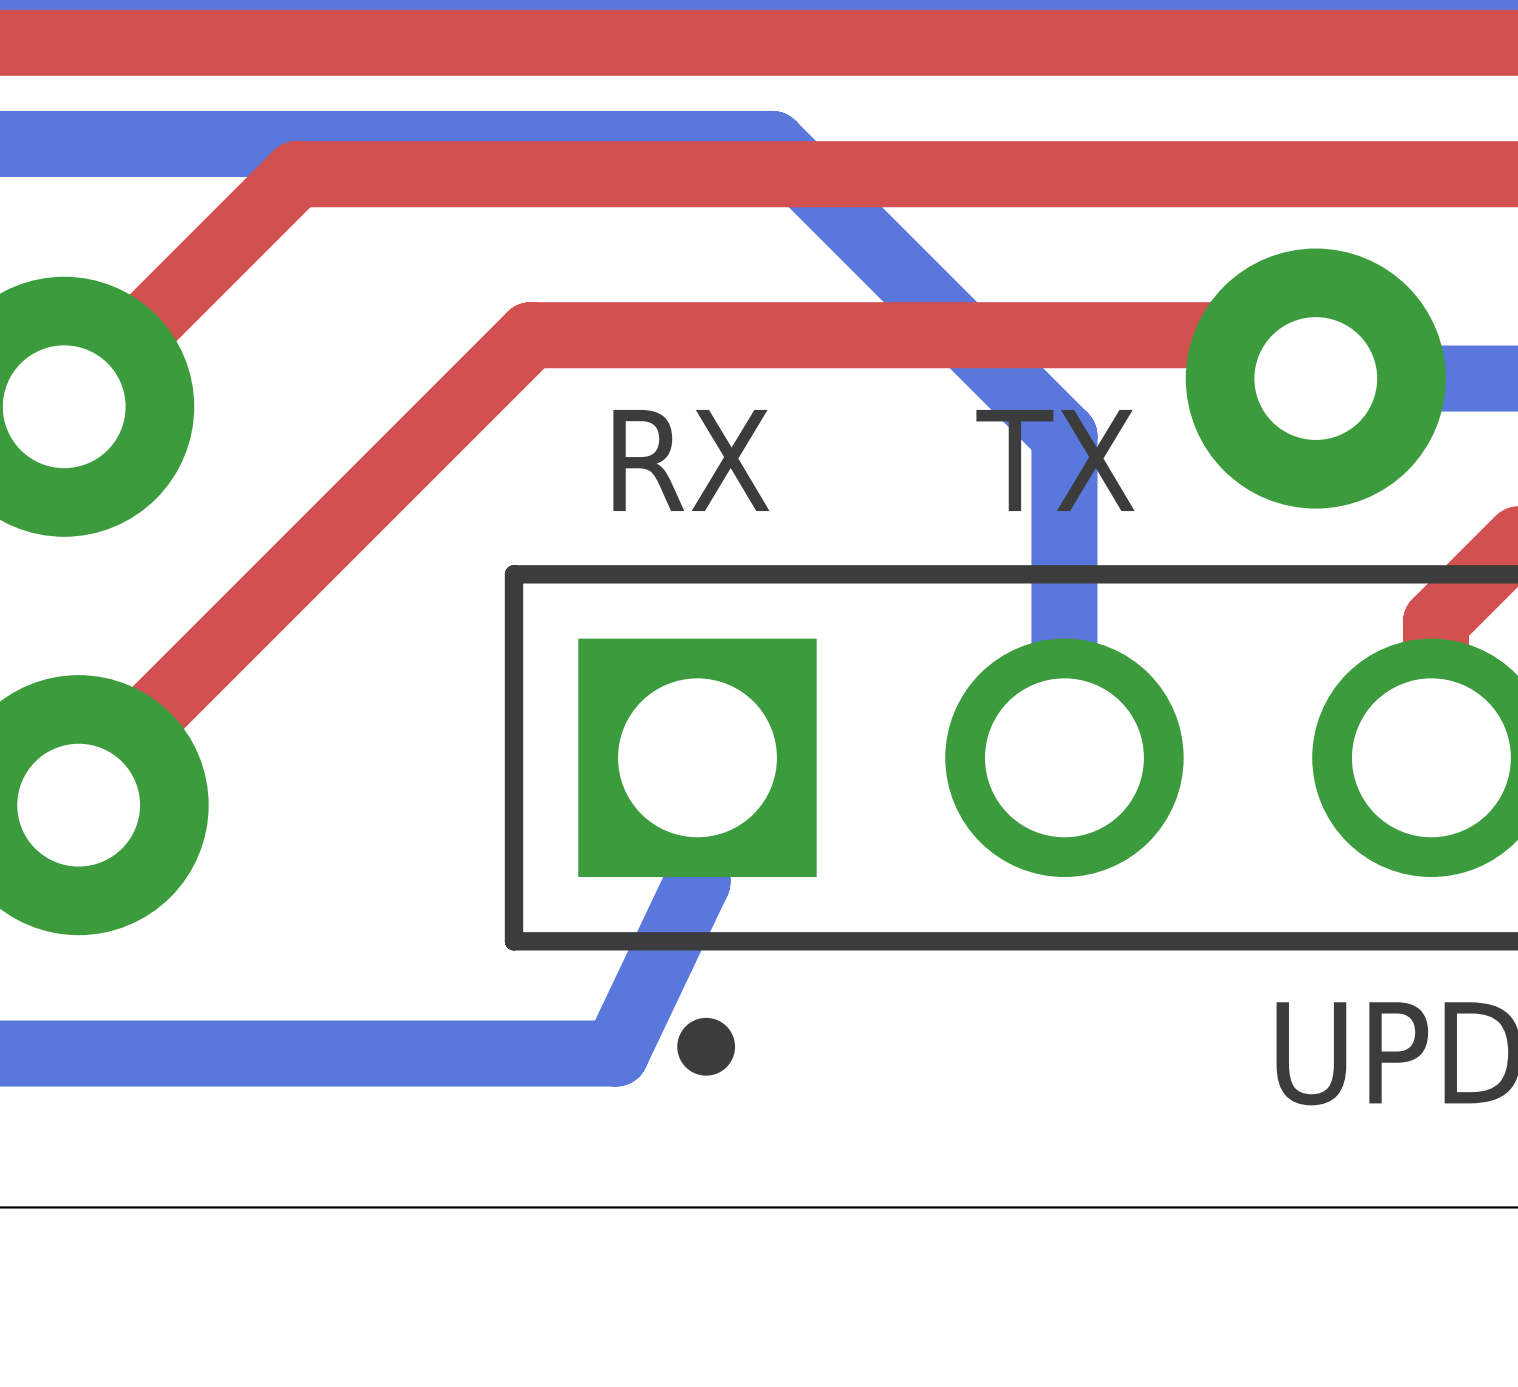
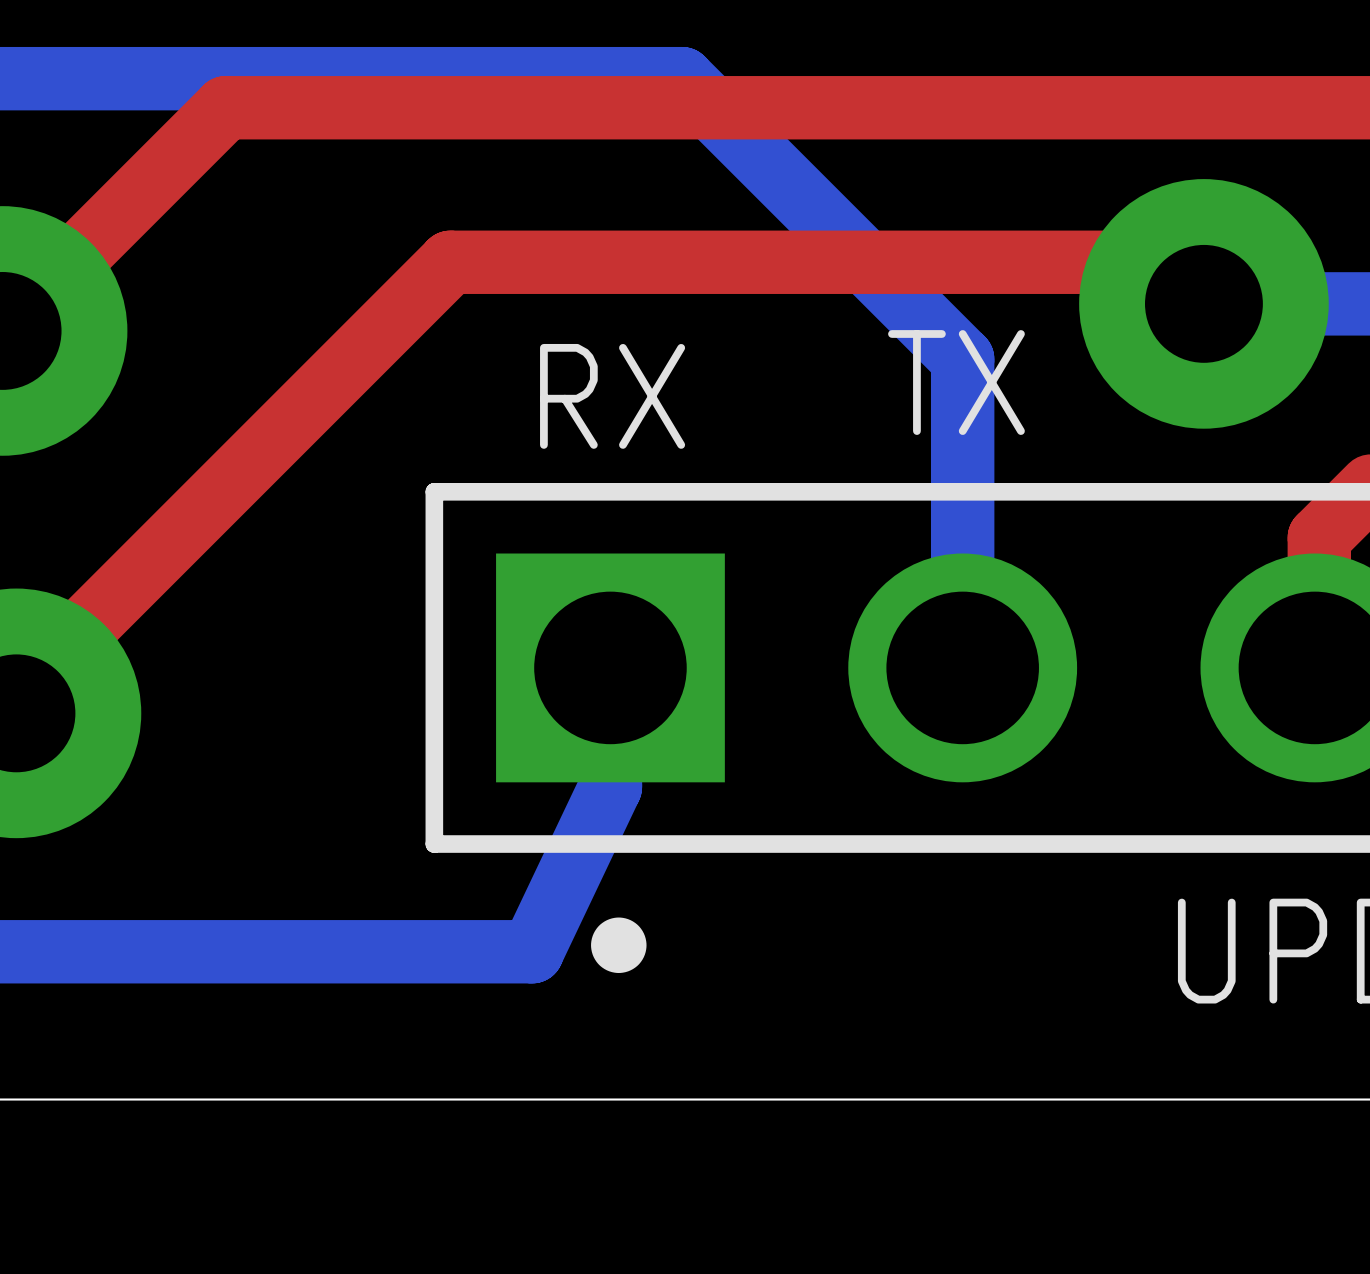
text position: RX (691, 460) -> RX (612, 396)

